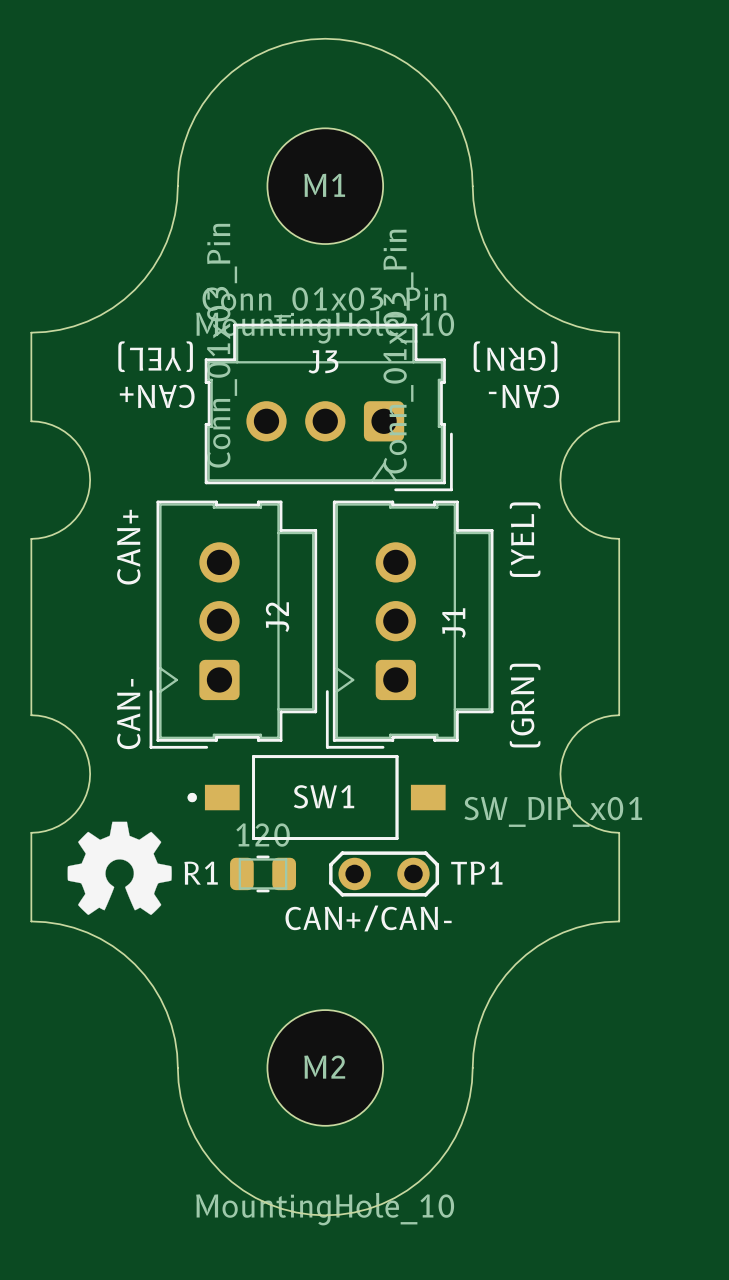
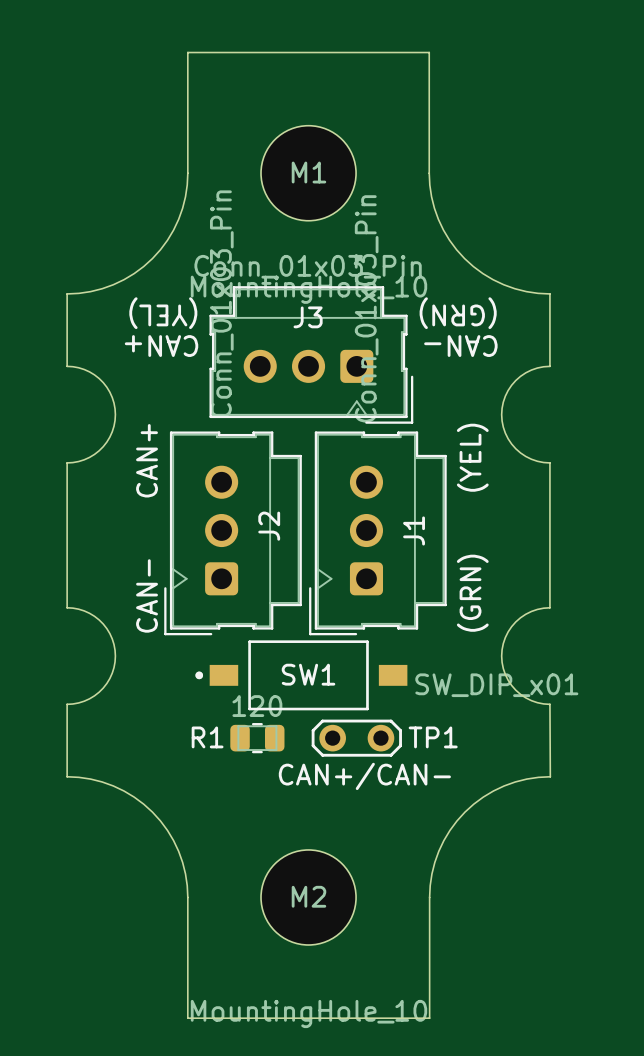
board edge: (31, 332) (73, 326) (100, 315) (124, 299) (144, 279) (160, 255) (171, 228) (177, 200) (180, 157) (189, 129) (202, 104) (221, 81) (243, 63) (268, 49) (296, 41) (325, 38) (354, 41) (381, 49) (407, 63) (429, 81) (447, 104) (461, 129) (469, 157) (473, 200) (479, 228) (490, 255) (505, 279) (526, 299) (550, 315) (576, 326) (619, 332) -> (67, 293) (102, 288) (134, 273) (160, 249) (173, 230) (182, 208) (187, 185) (187, 52) (429, 52) (429, 185) (434, 208) (443, 230) (464, 258) (493, 279) (526, 291) (549, 293)
drawing: [67, 821, 172, 915] -> none
board edge: (619, 832) (619, 921) (590, 924) (563, 932) (537, 946) (515, 964) (497, 986) (483, 1011) (475, 1039) (472, 1082) (466, 1110) (447, 1149) (429, 1172) (407, 1190) (381, 1204) (354, 1212) (325, 1215) (282, 1209) (255, 1197) (231, 1181) (211, 1161) (189, 1124) (180, 1096) (177, 1053) (171, 1025) (160, 998) (144, 975) (124, 954) (87, 932) (59, 924) (31, 921) -> (549, 704) (550, 776) (515, 781) (483, 797) (457, 820) (438, 851) (430, 885) (429, 1018) (187, 1018) (187, 885) (182, 862) (173, 840) (160, 820) (134, 797) (102, 781) (67, 776)

